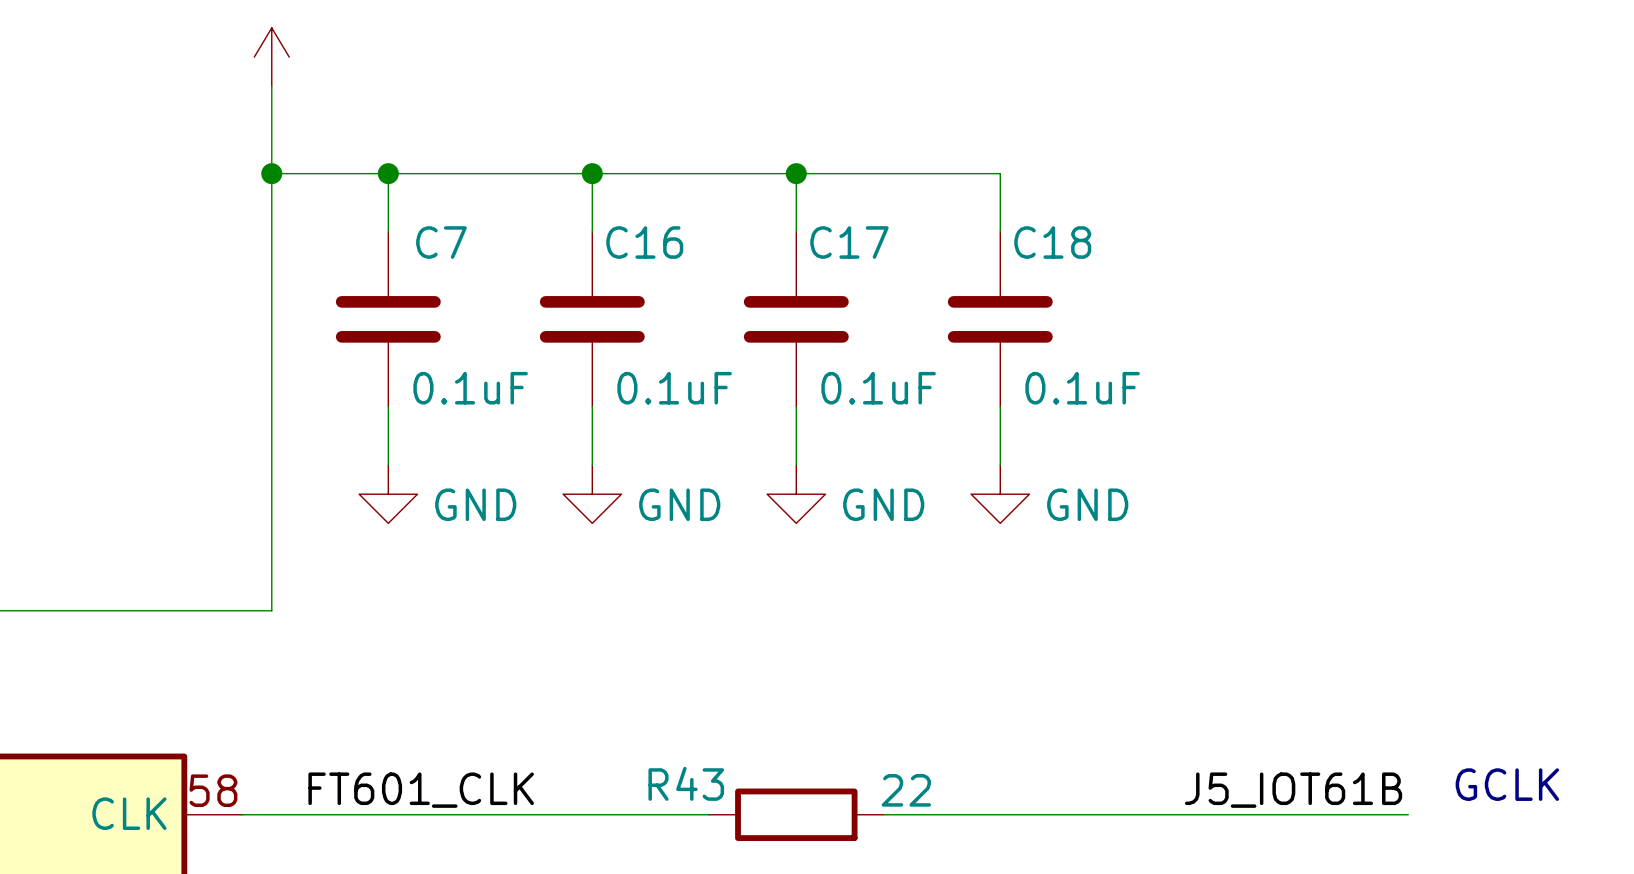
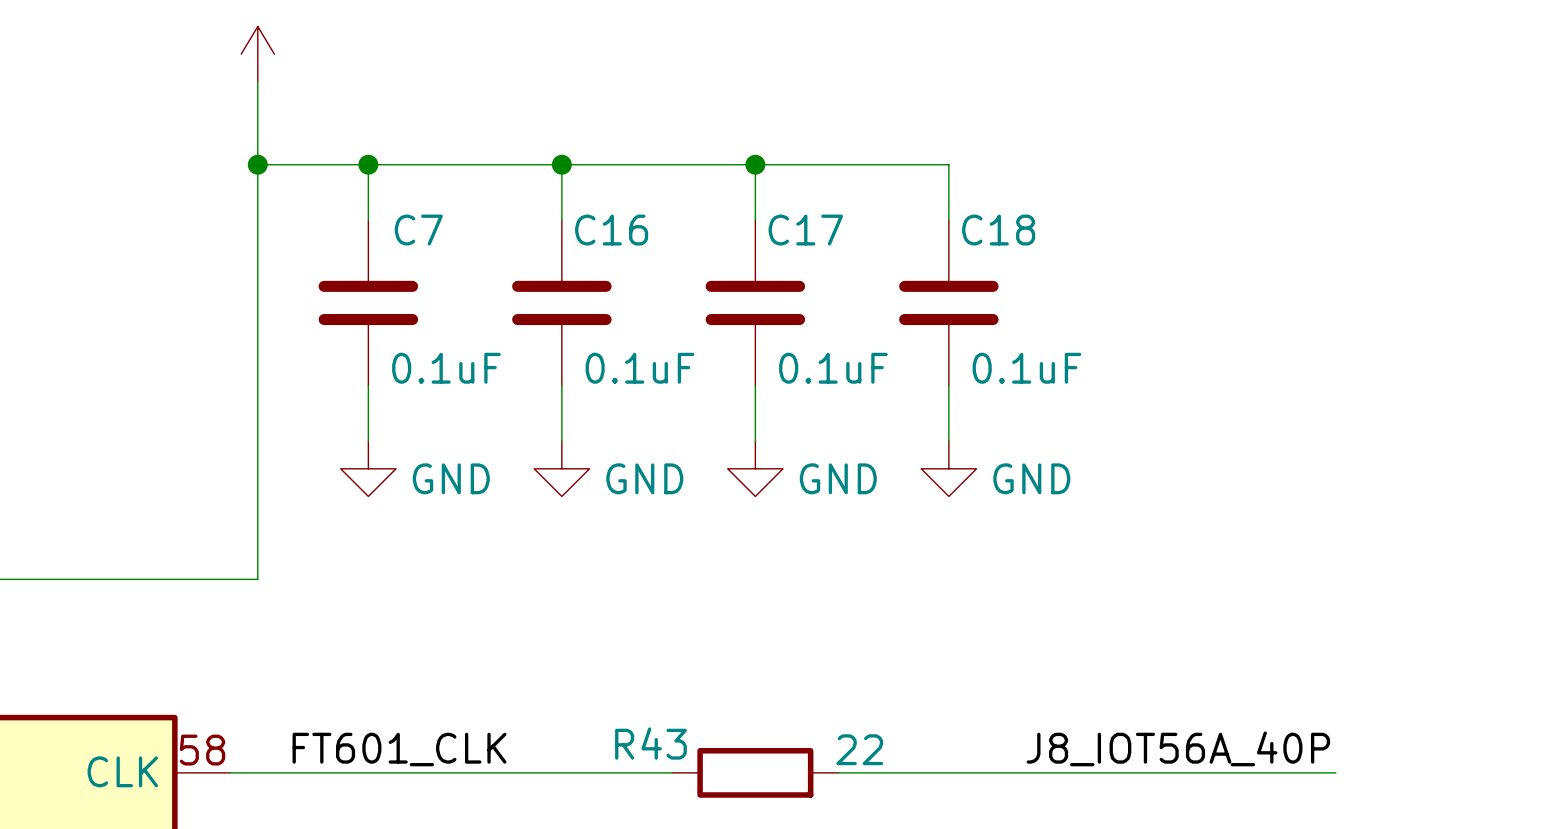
text: GCLK (1507, 784) -> none
label: J5_IOT61B (1293, 790) -> J8_IOT56A_40P (1178, 748)

